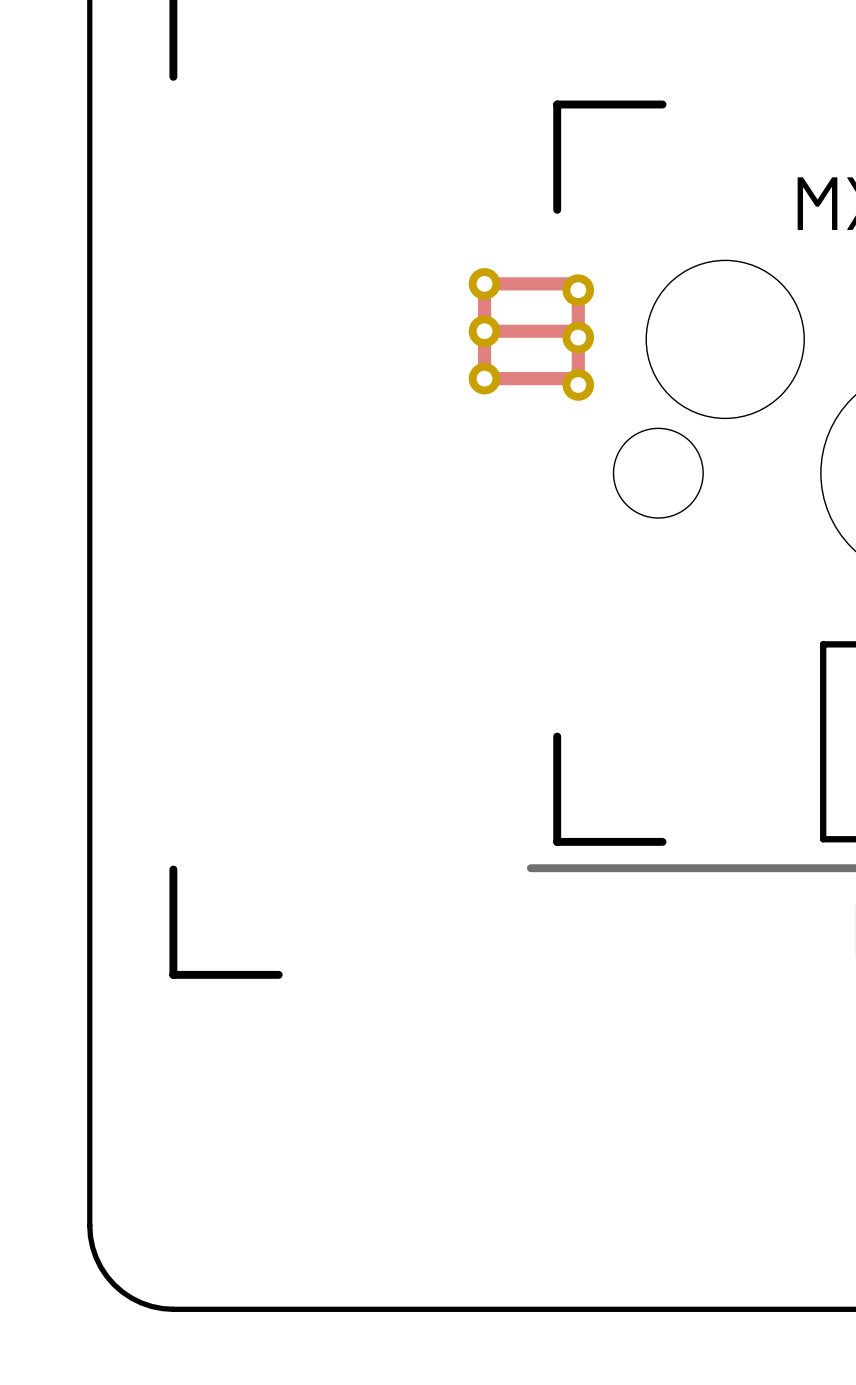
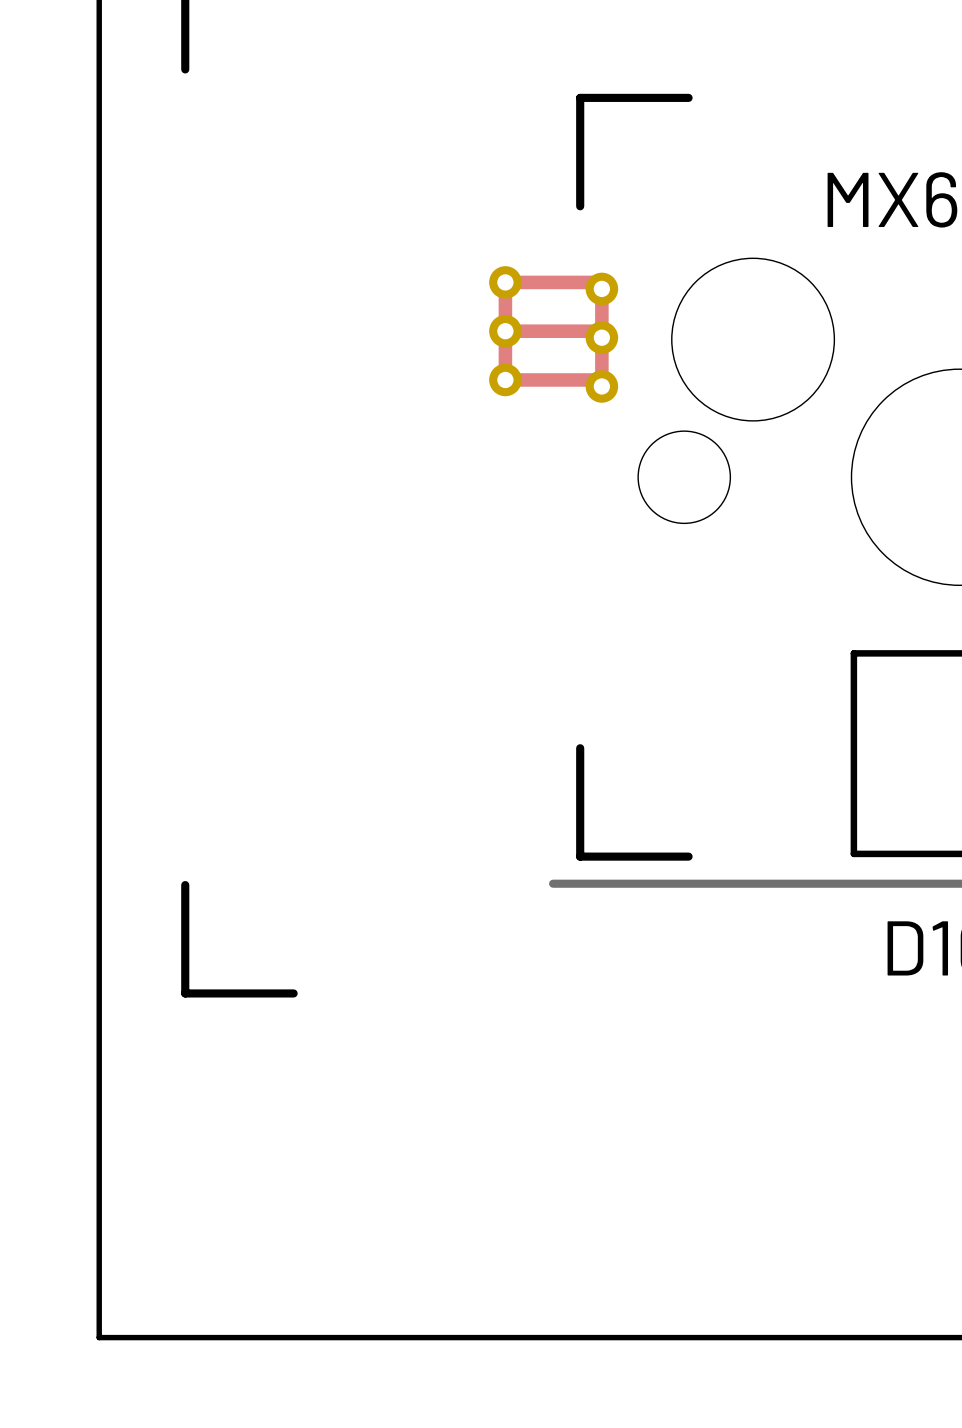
board edge: (89, 1225) (96, 1257) (114, 1284) (141, 1302) (173, 1309) -> (99, 1251) (99, 1337) (185, 1337)

